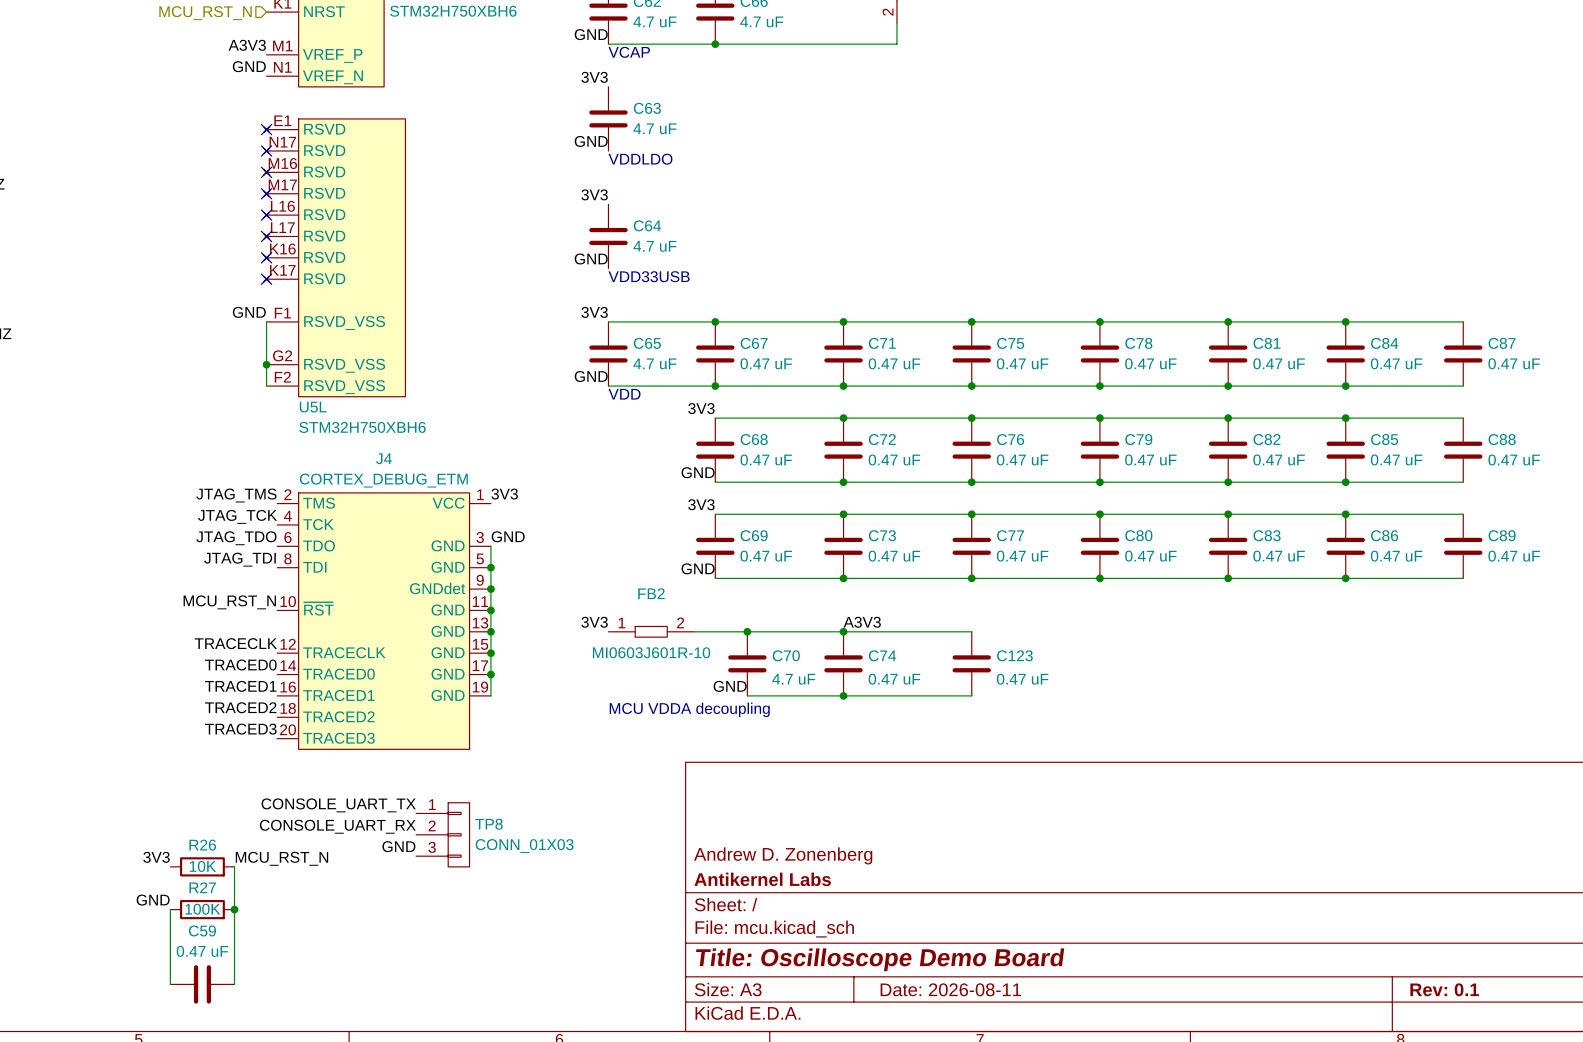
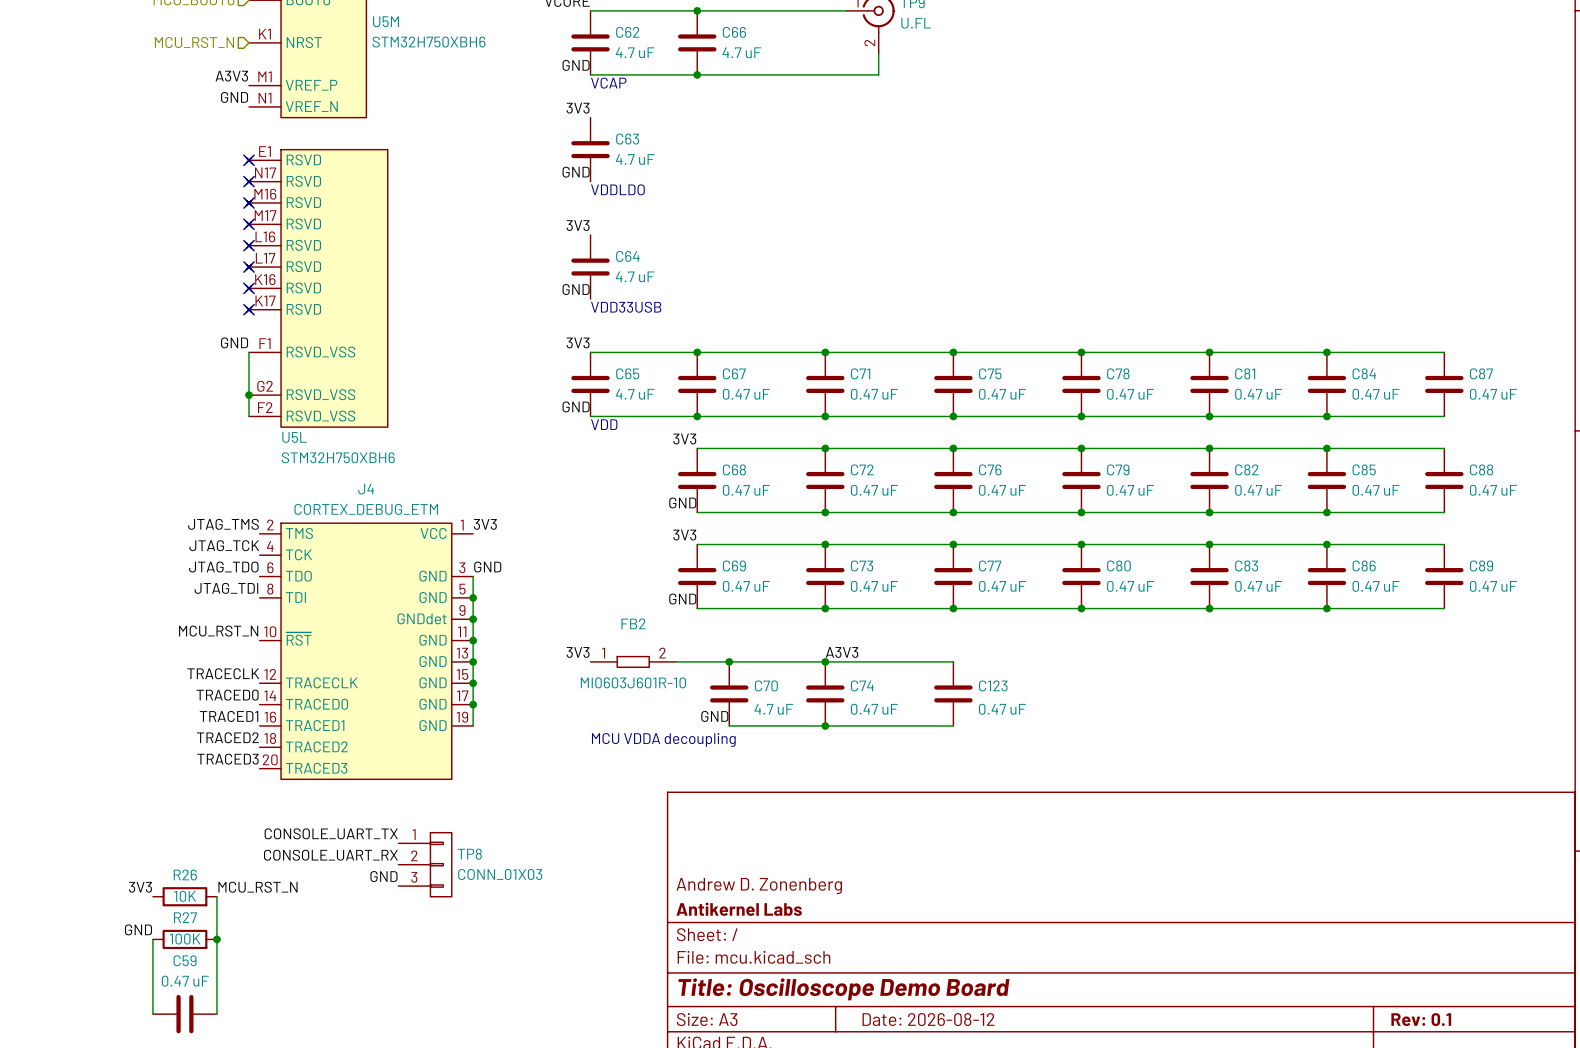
title block: Date: 2026-08-11 (950, 989) -> Date: 2026-08-12 (928, 1019)

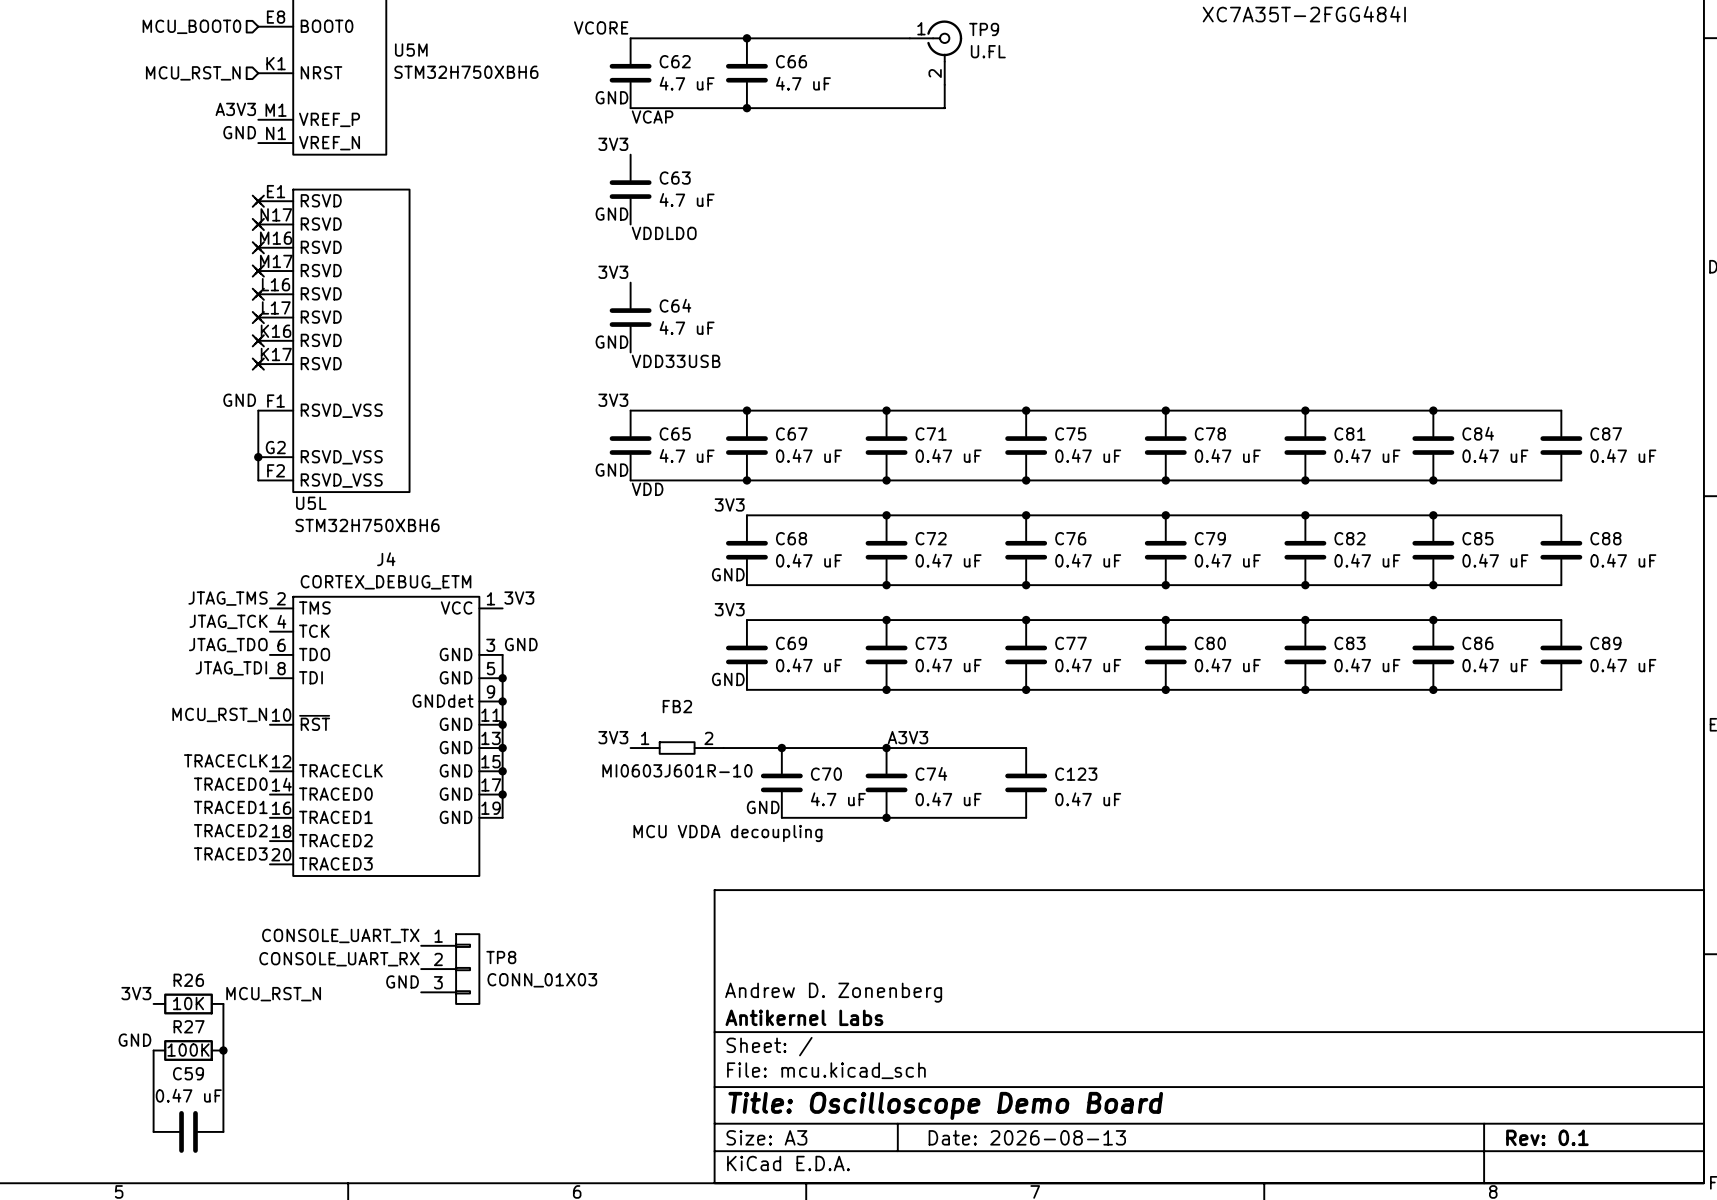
title block: Date: 2026-08-12 (928, 1019) -> Date: 2026-08-13 (1027, 1137)

